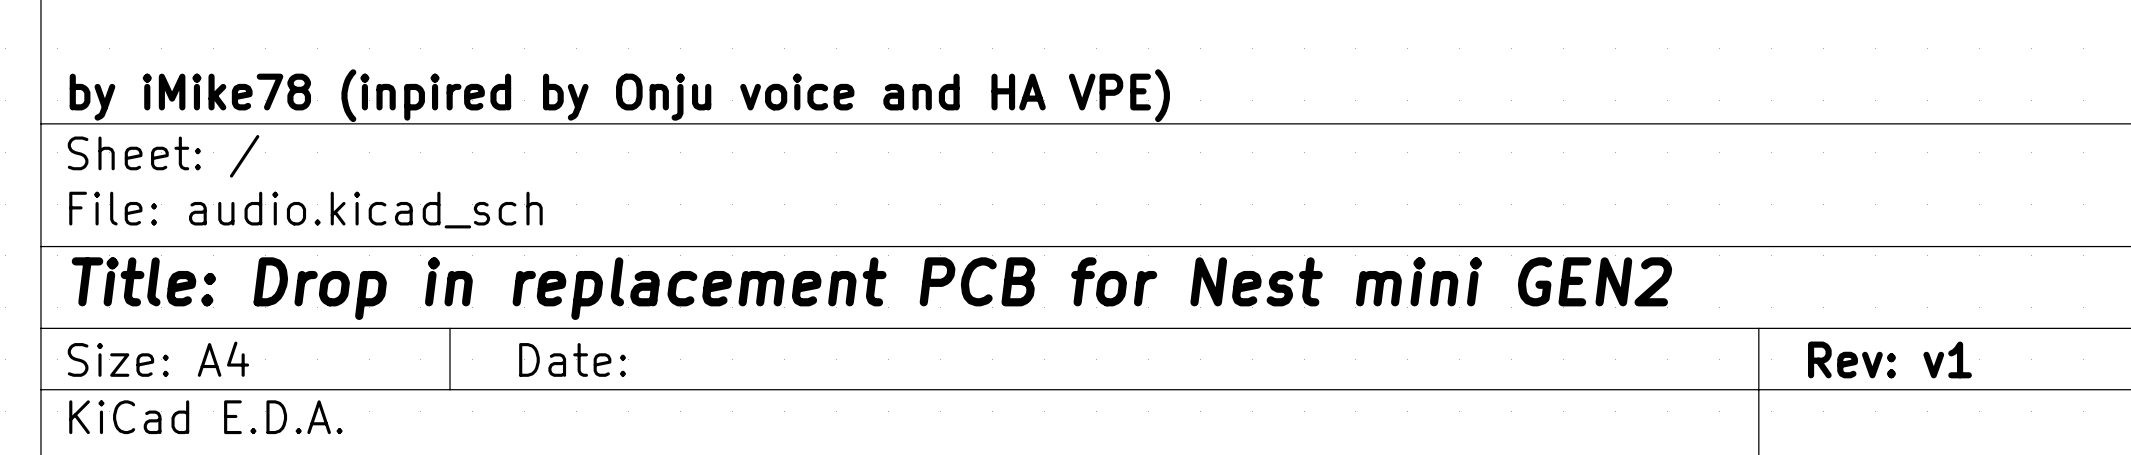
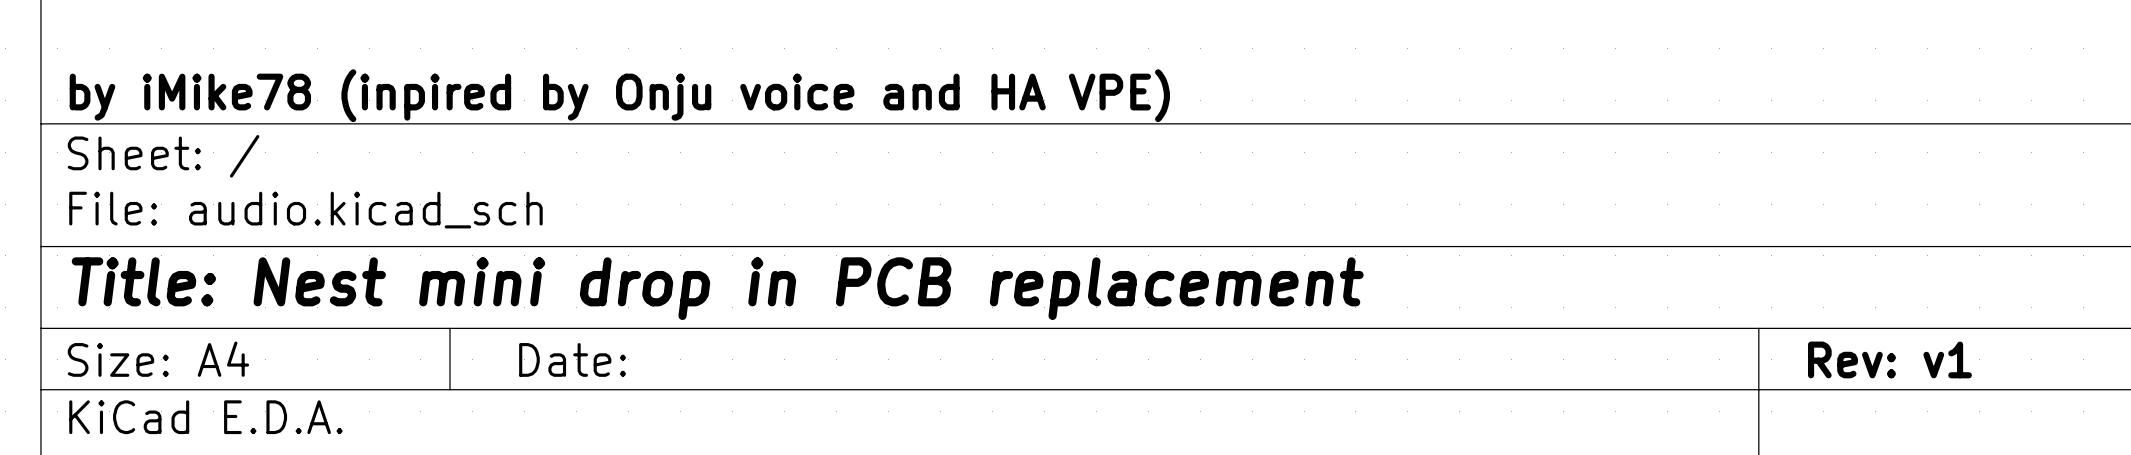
title block: Title: Drop in replacement PCB for Nest mini GEN2 (871, 288) -> Title: Nest mini drop in PCB replacement (717, 288)

